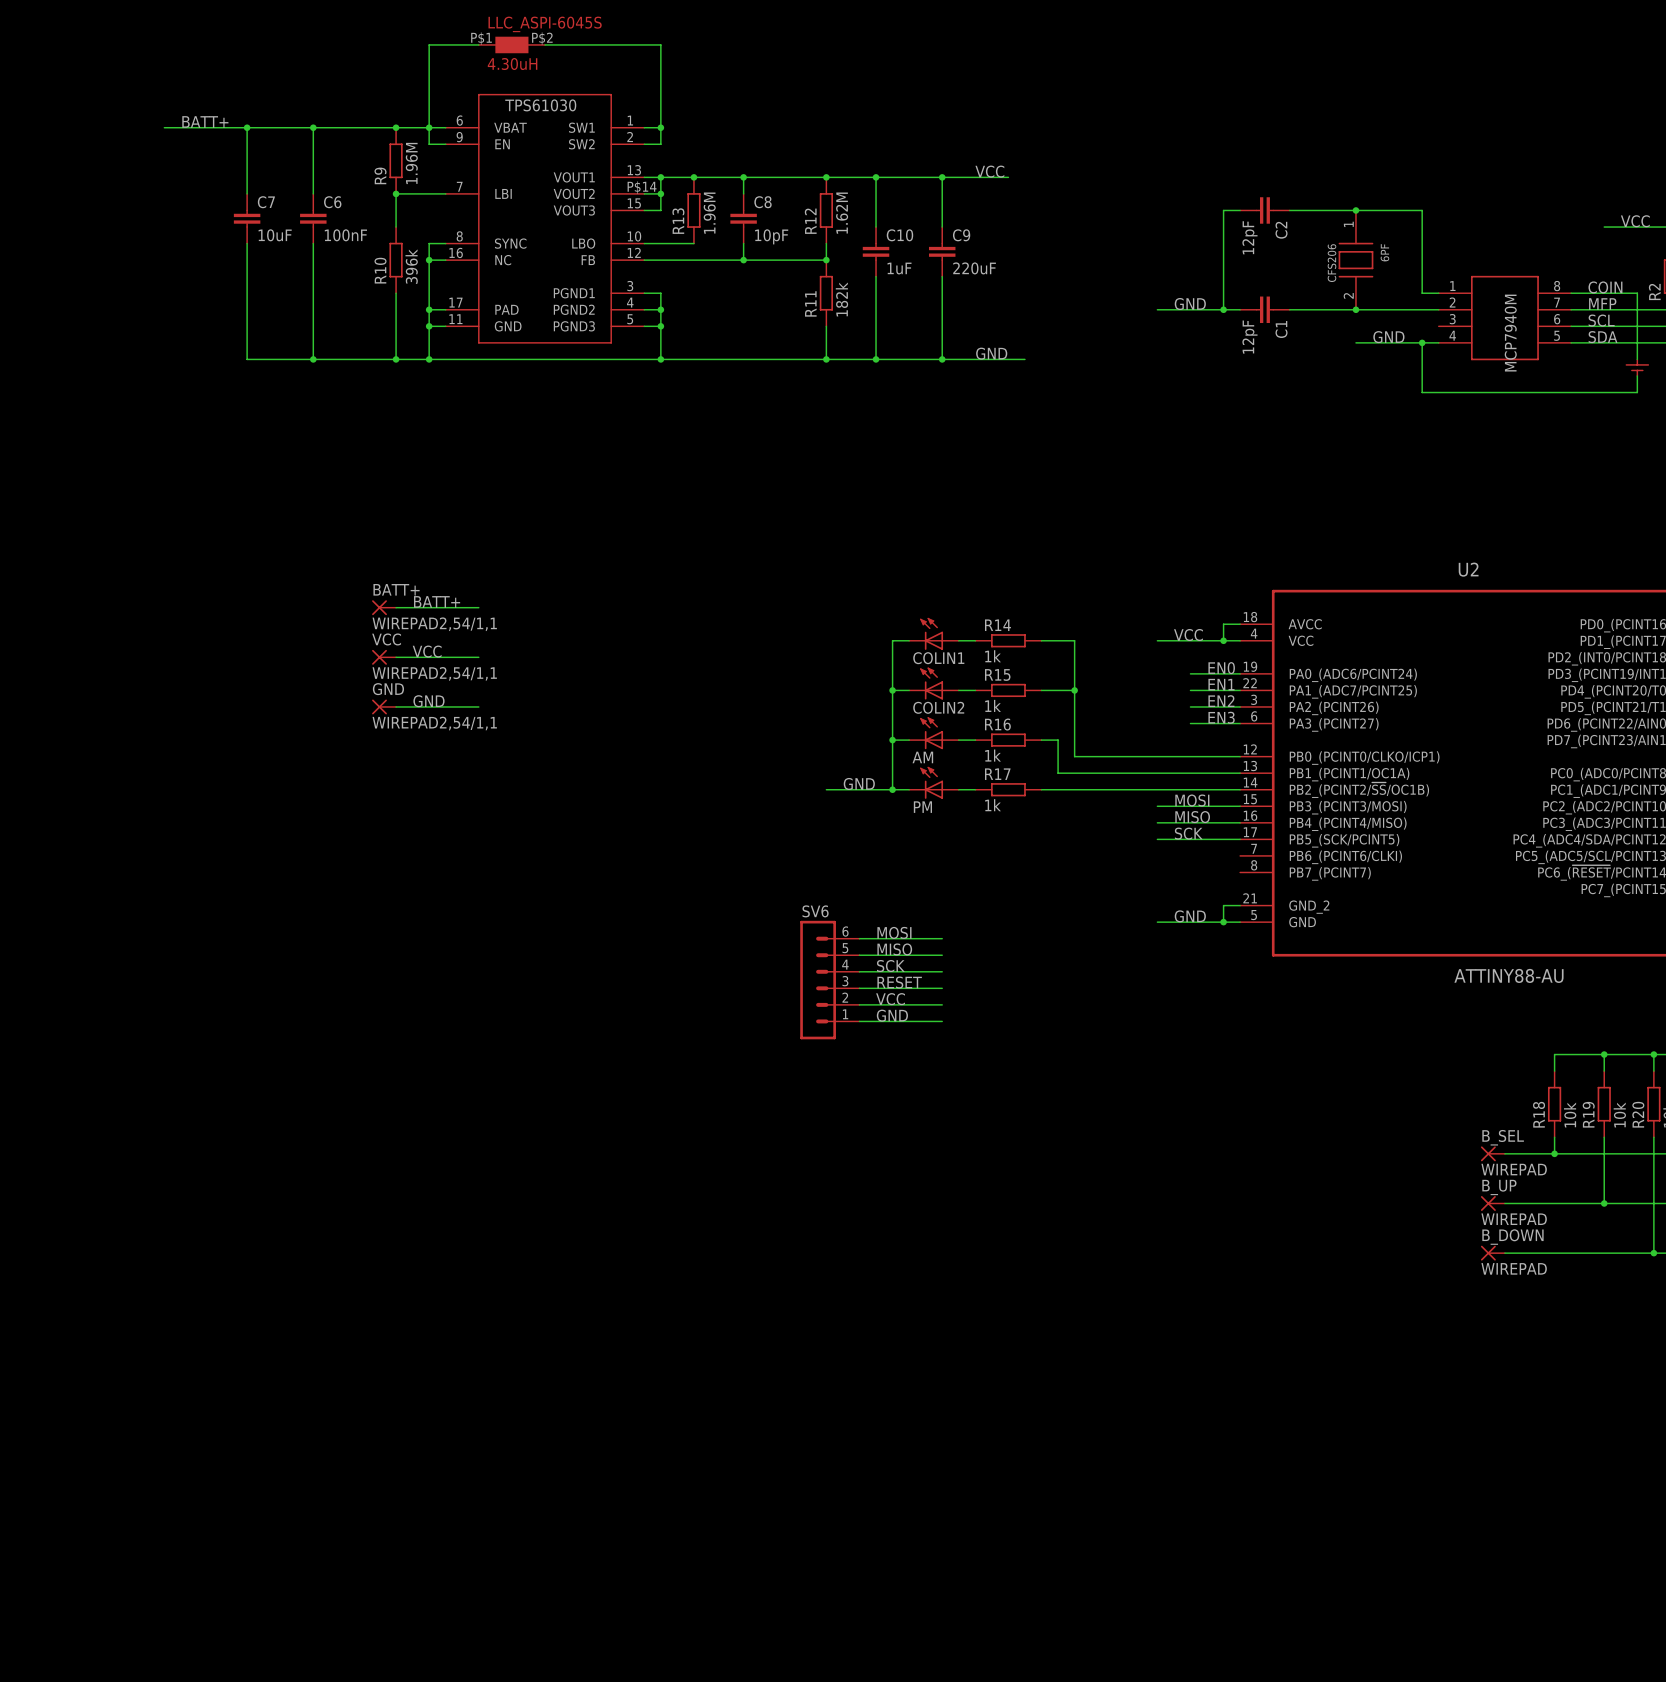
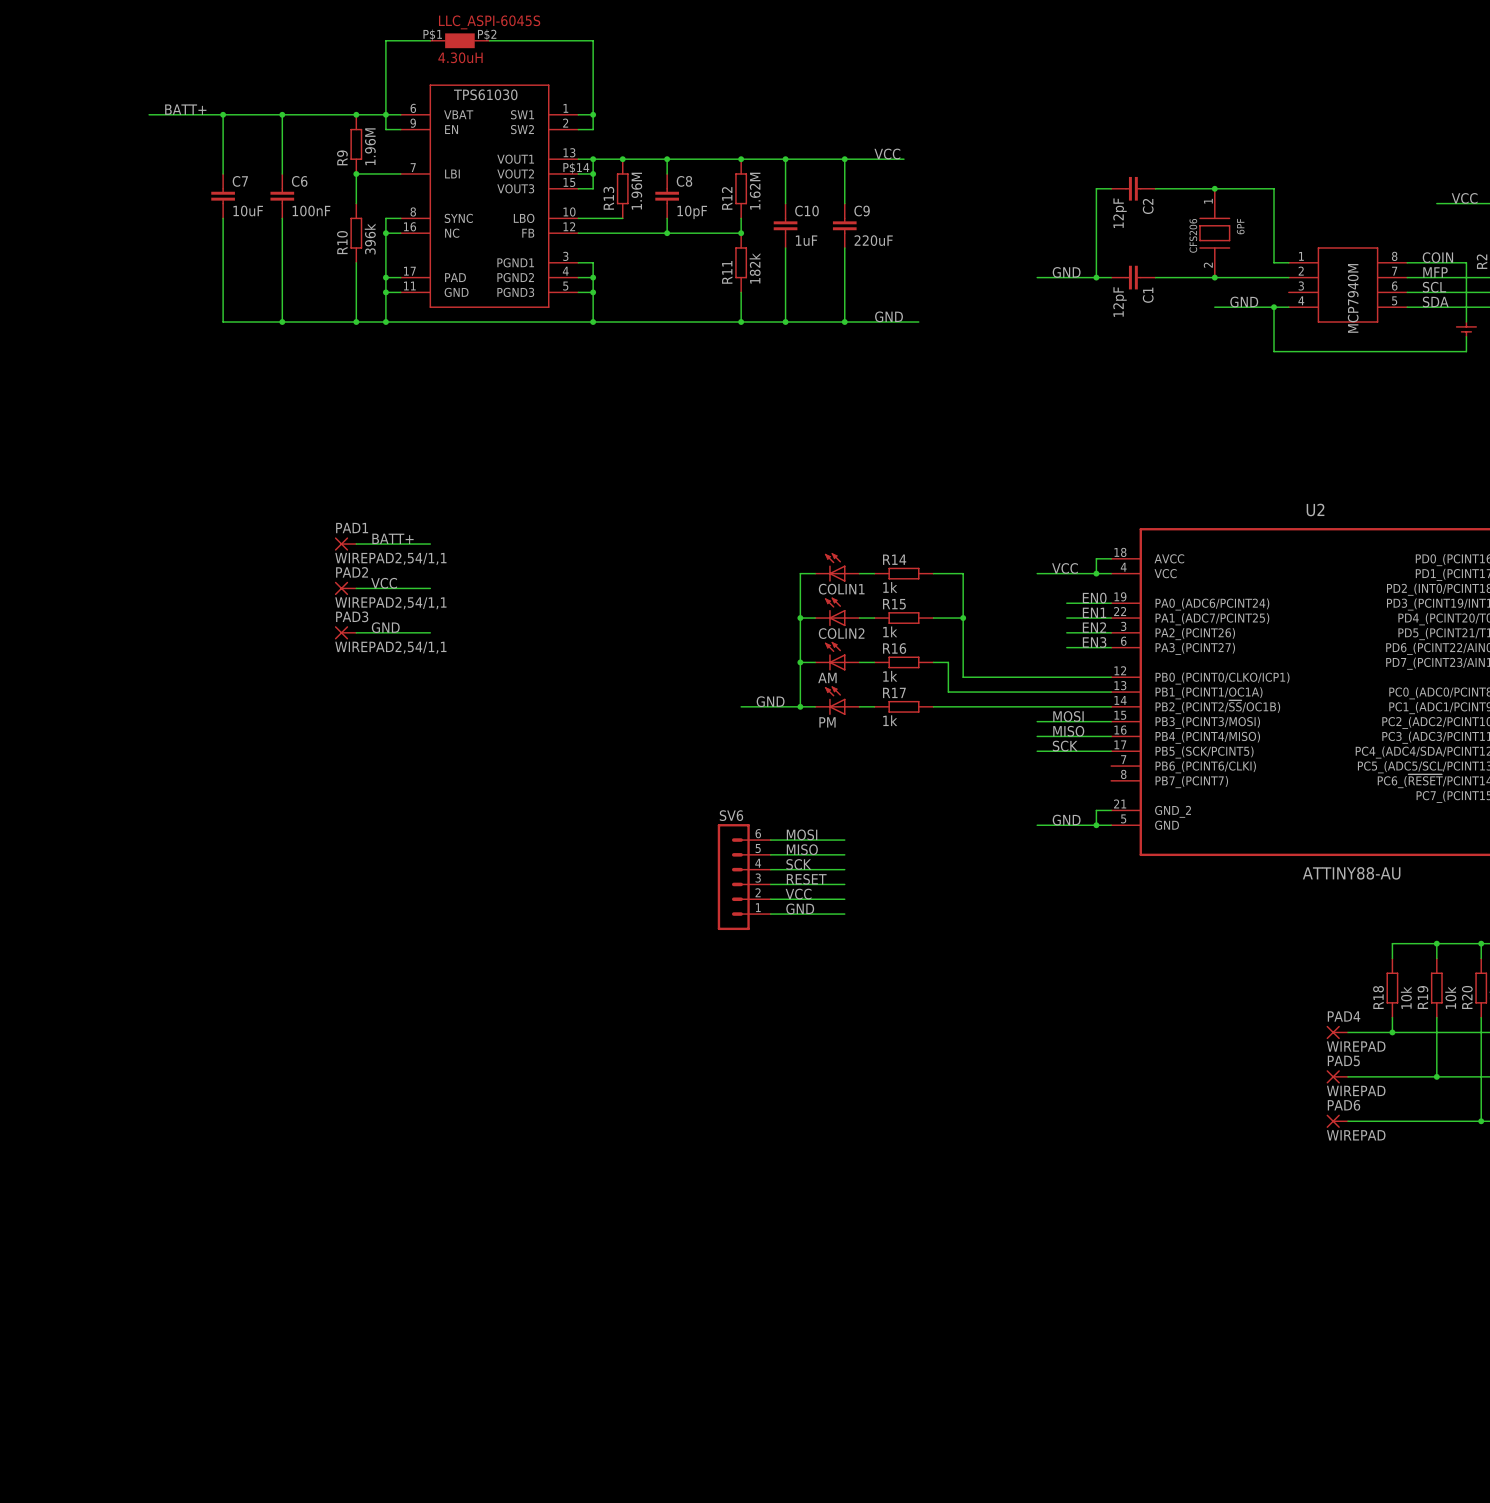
BATT+ name: BATT+ (396, 589) -> PAD1 (352, 528)
VCC name: VCC (386, 639) -> PAD2 (352, 572)
GND name: GND (388, 689) -> PAD3 (352, 616)
B_SEL name: B_SEL (1503, 1137) -> PAD4 (1344, 1016)
B_UP name: B_UP (1499, 1187) -> PAD5 (1343, 1060)
B_DOWN name: B_DOWN (1512, 1237) -> PAD6 (1344, 1105)

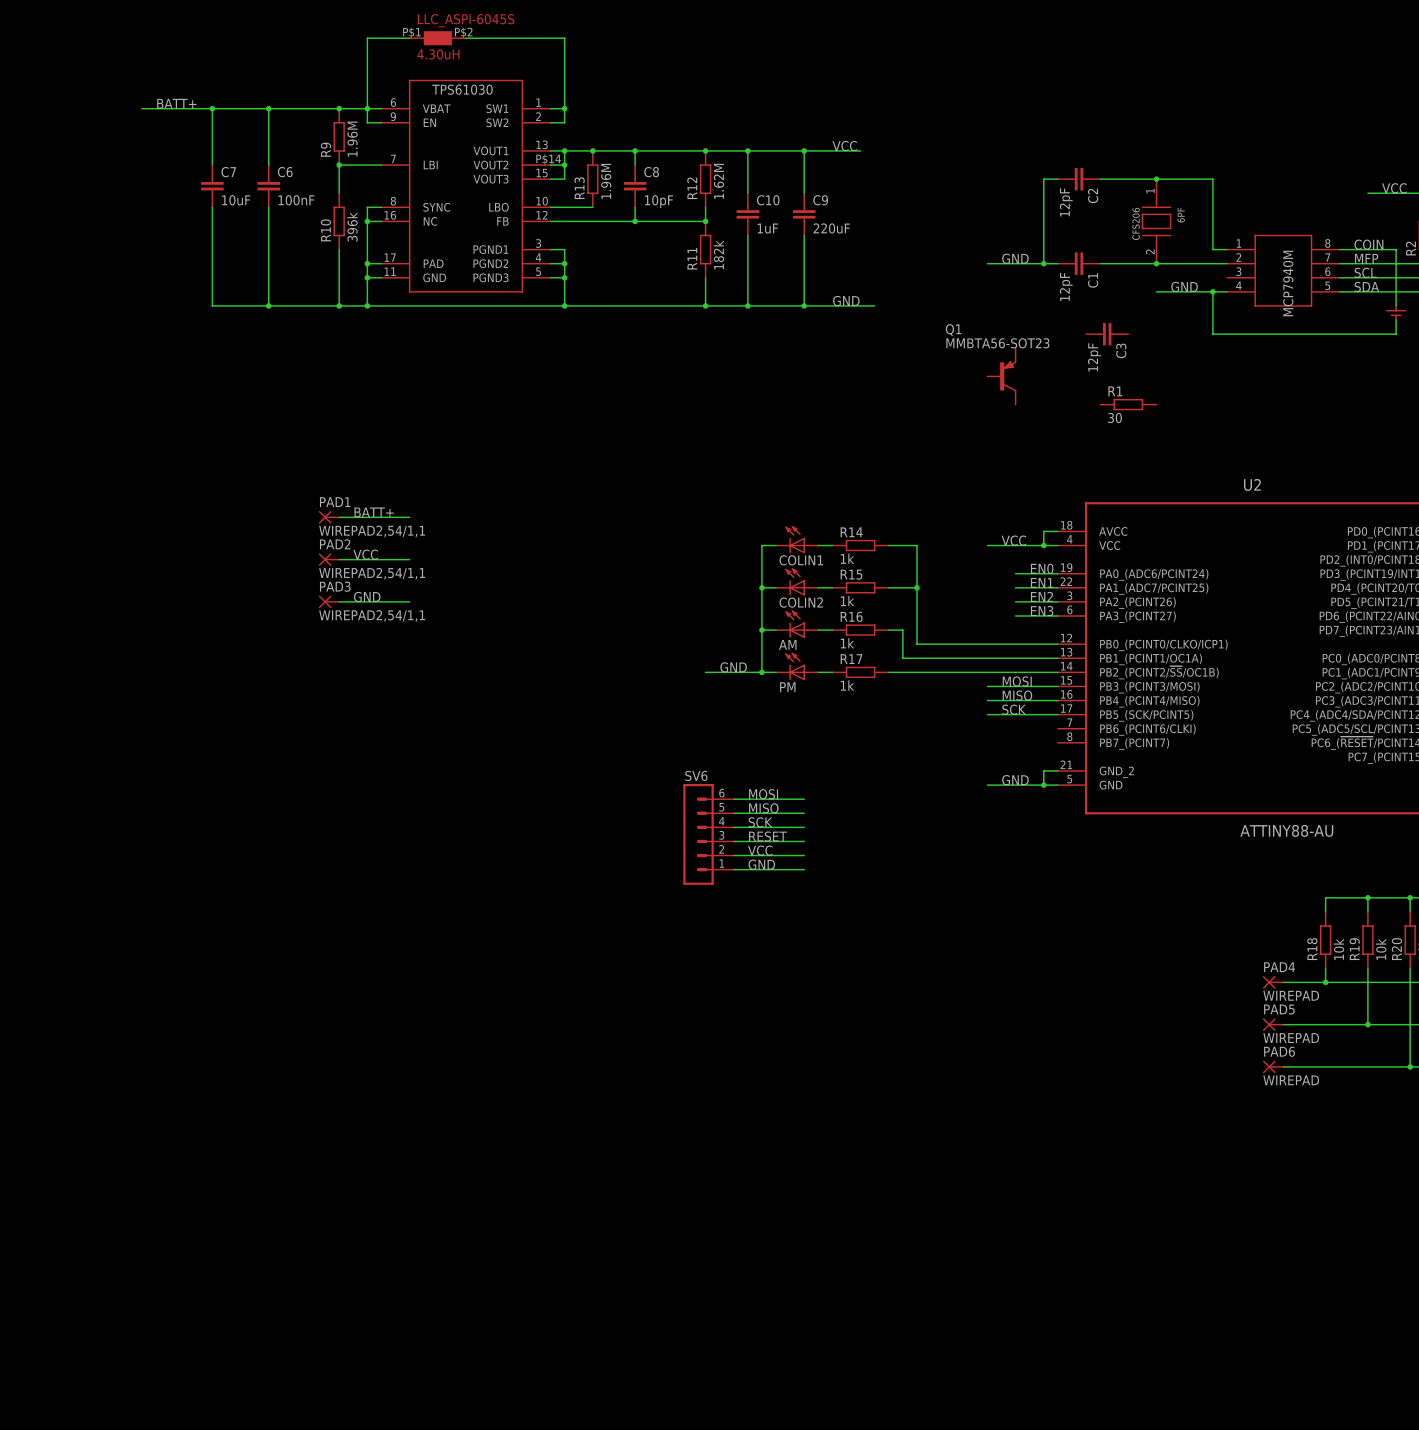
C3: none -> 12pF (1107, 334)
Q1: none -> MMBTA56-SOT23 (1001, 376)
R1: none -> 30 (1128, 404)

